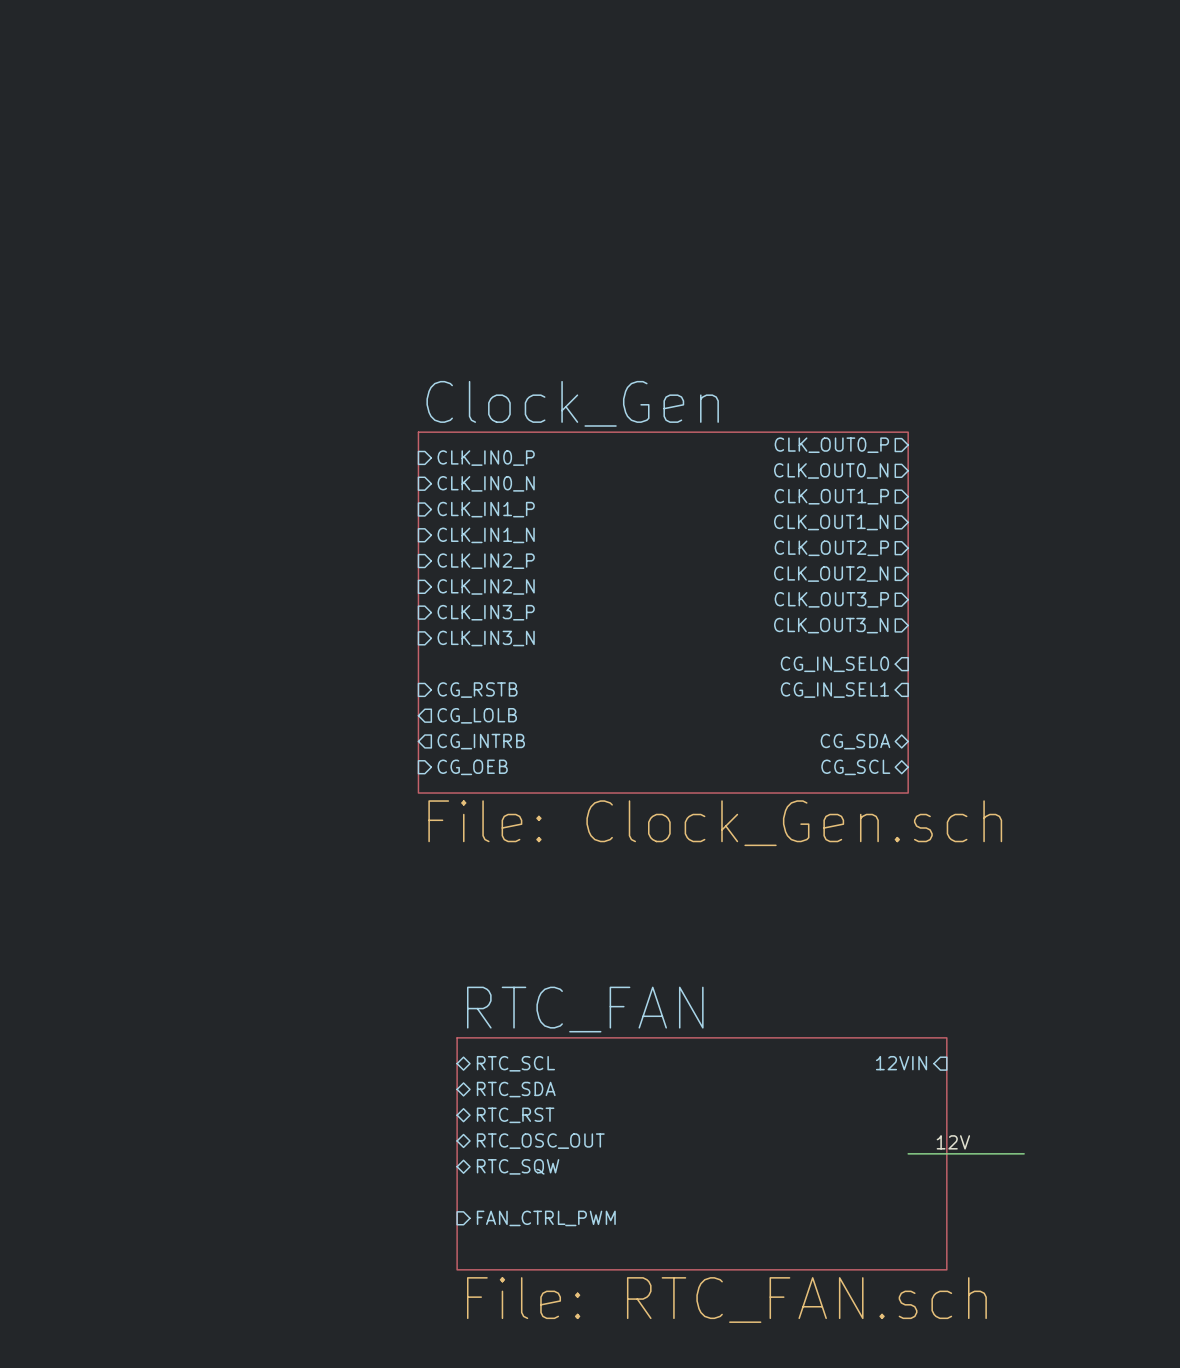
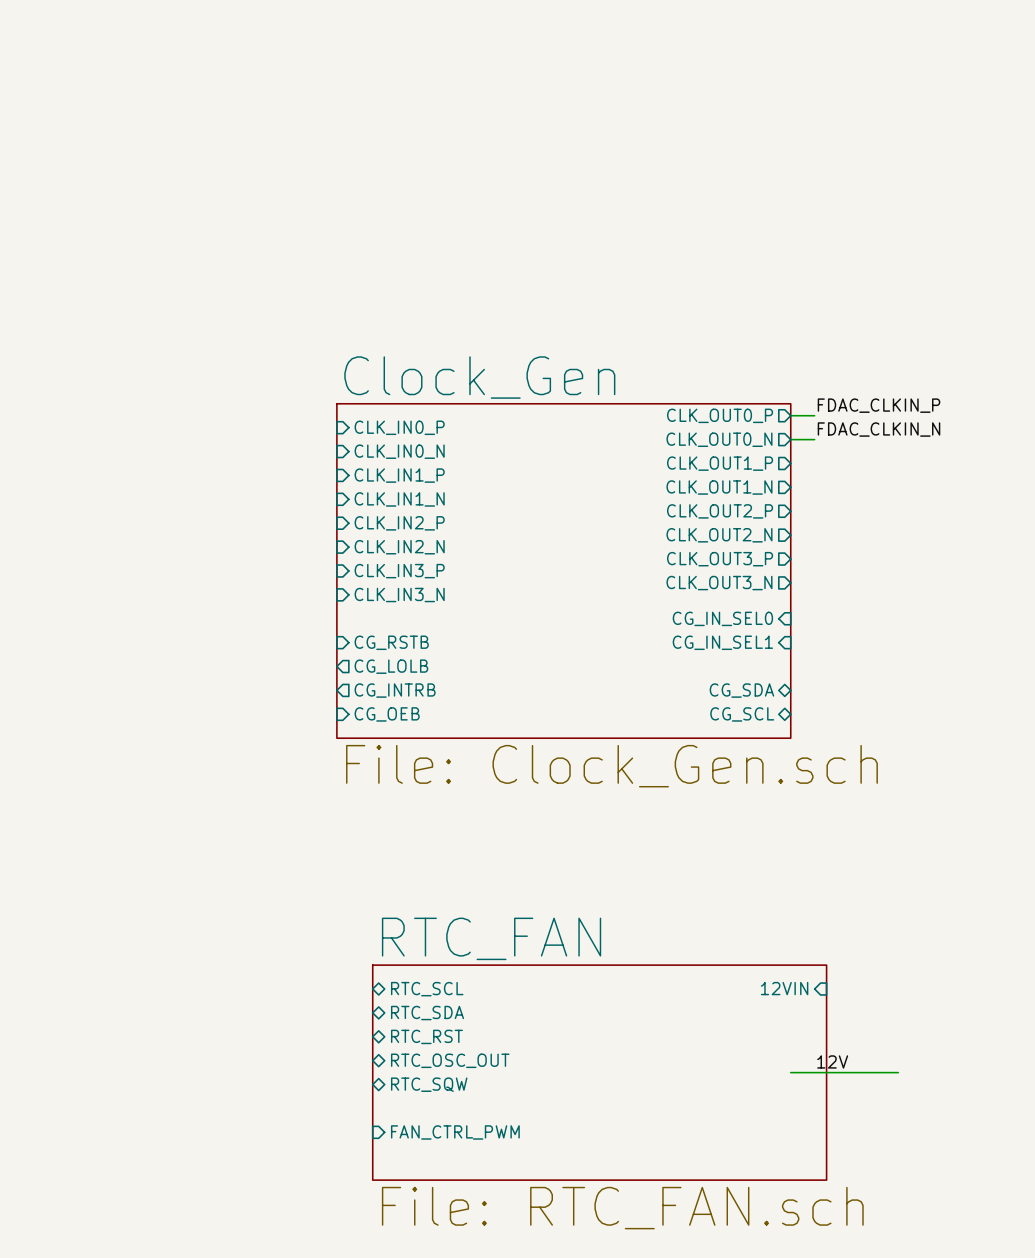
label: none -> FDAC_CLKIN_P (879, 405)
wire: none -> (790, 415) (814, 415)
label: none -> FDAC_CLKIN_N (879, 429)
wire: none -> (790, 439) (814, 439)

